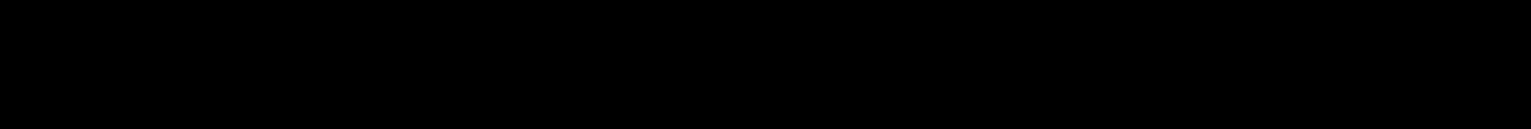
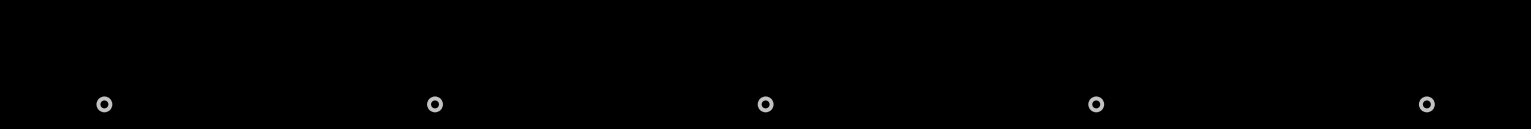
via: none -> (104, 104)
via: none -> (435, 104)
via: none -> (765, 104)
via: none -> (1096, 104)
via: none -> (1426, 104)

